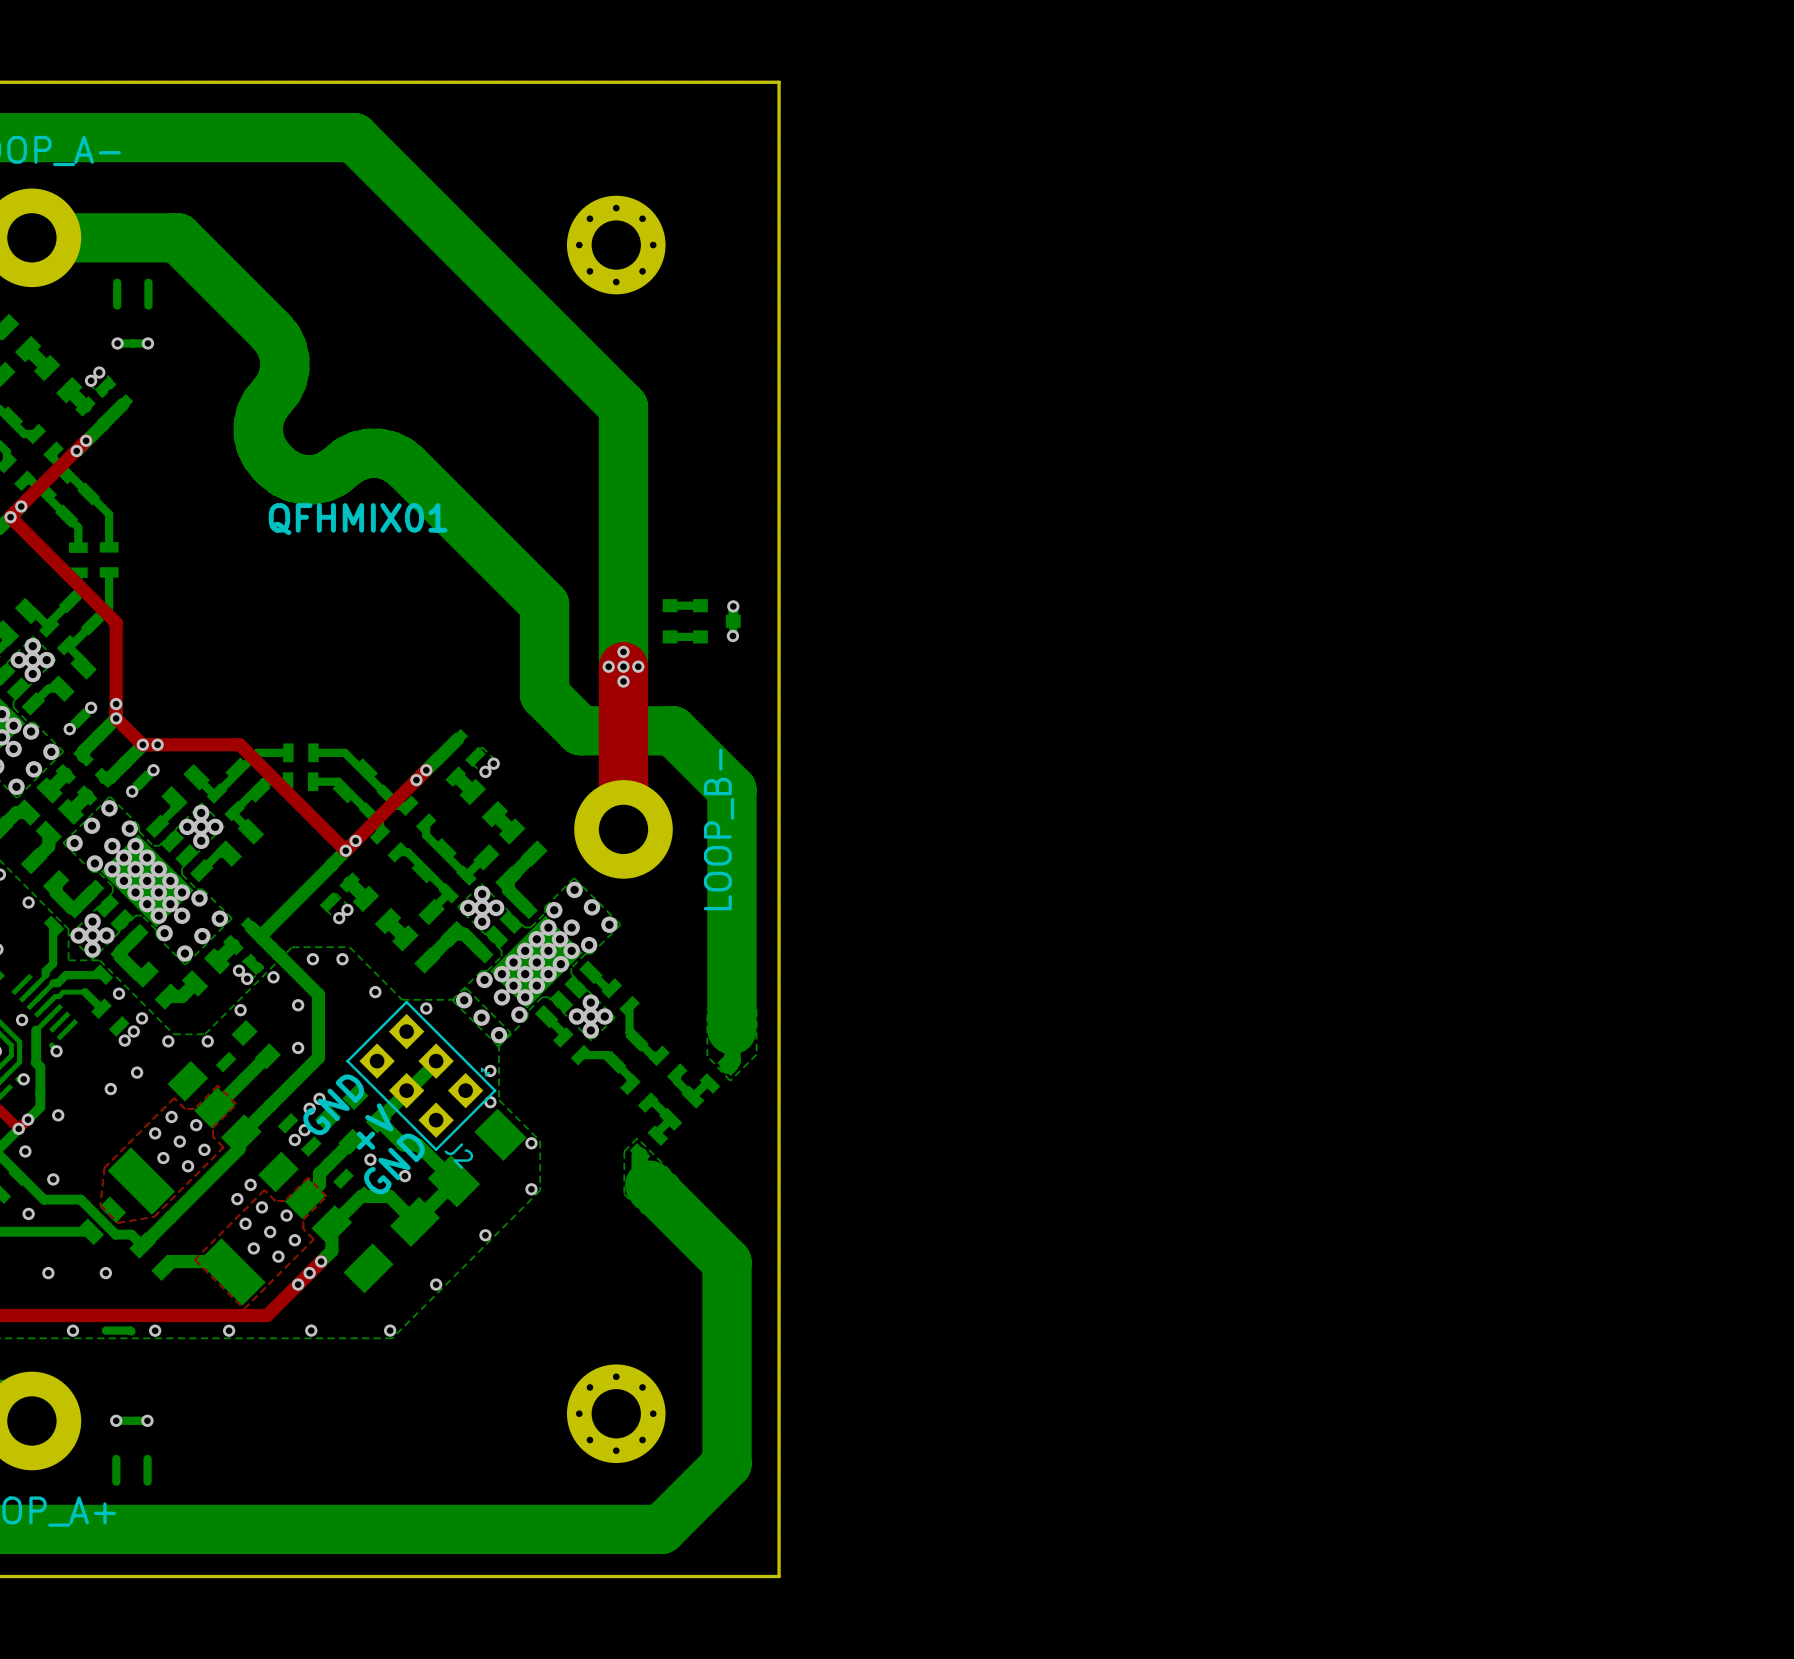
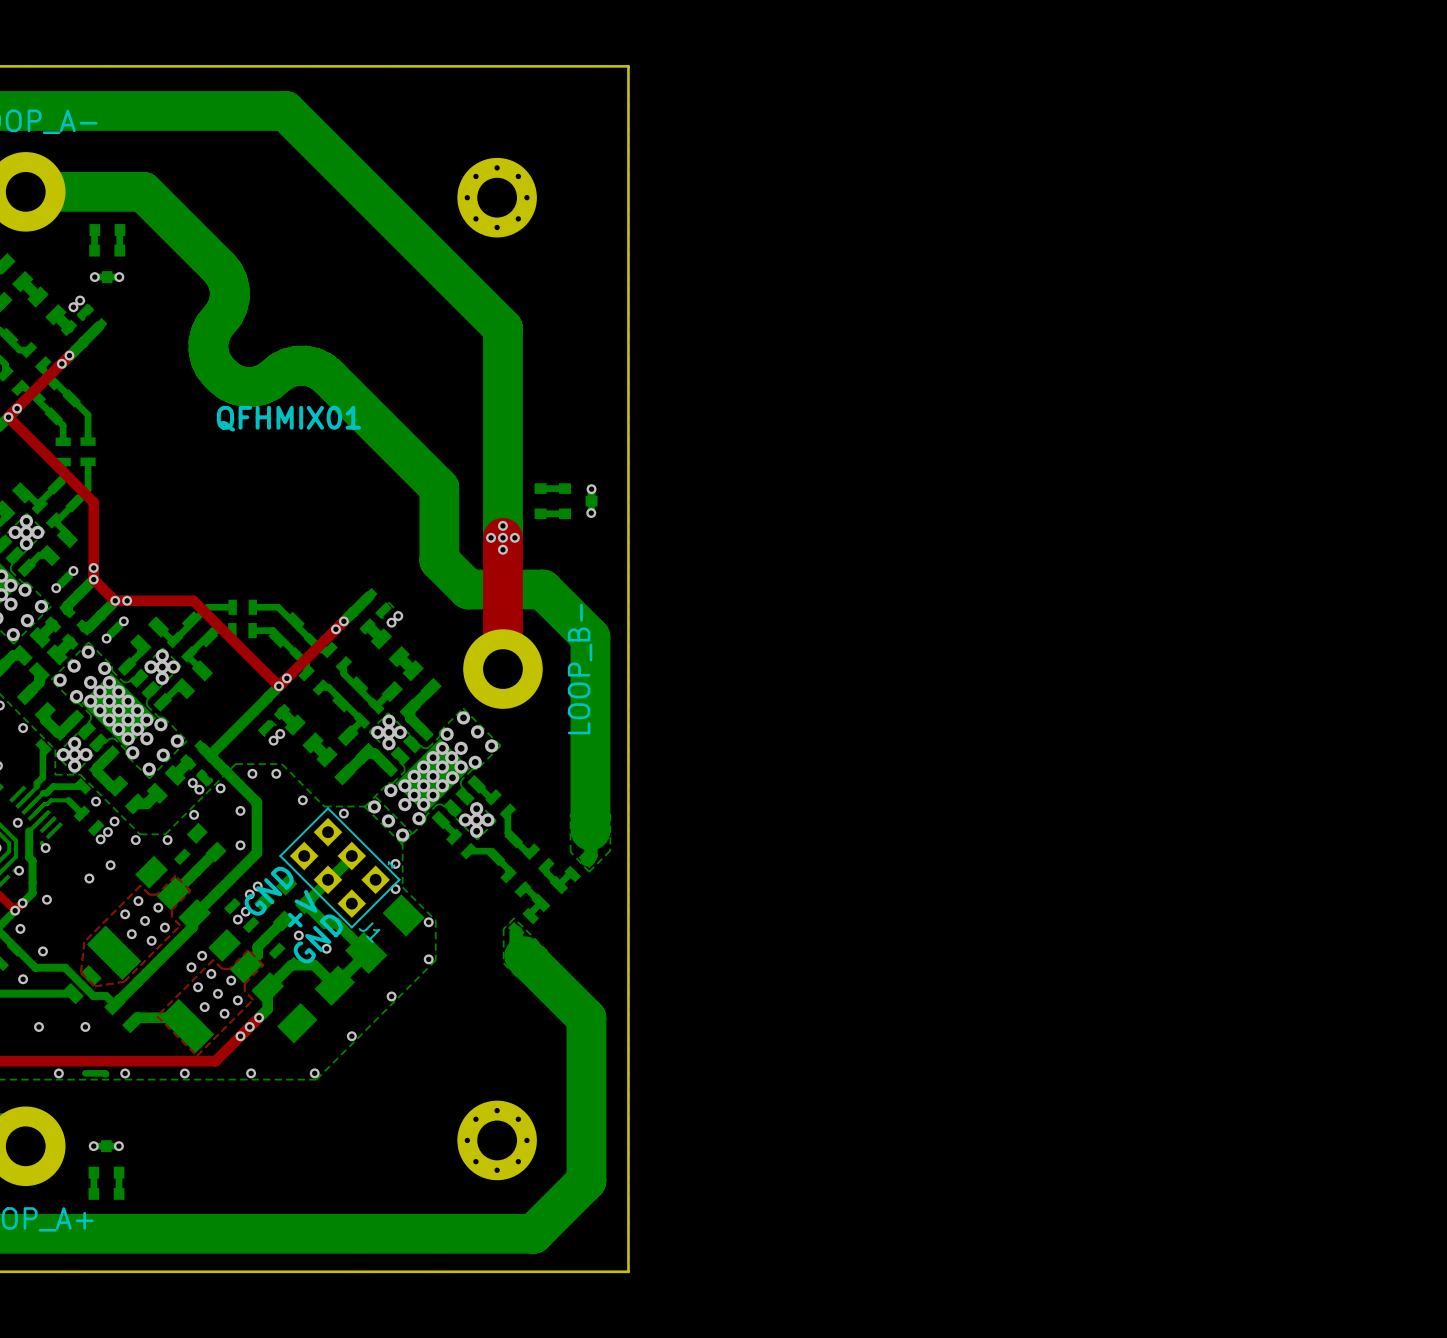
part: none -> (107, 216)
part: none -> (107, 263)
J2 name: J2 (458, 1156) -> J1 (369, 932)
part: none -> (106, 1159)
part: none -> (106, 1207)

